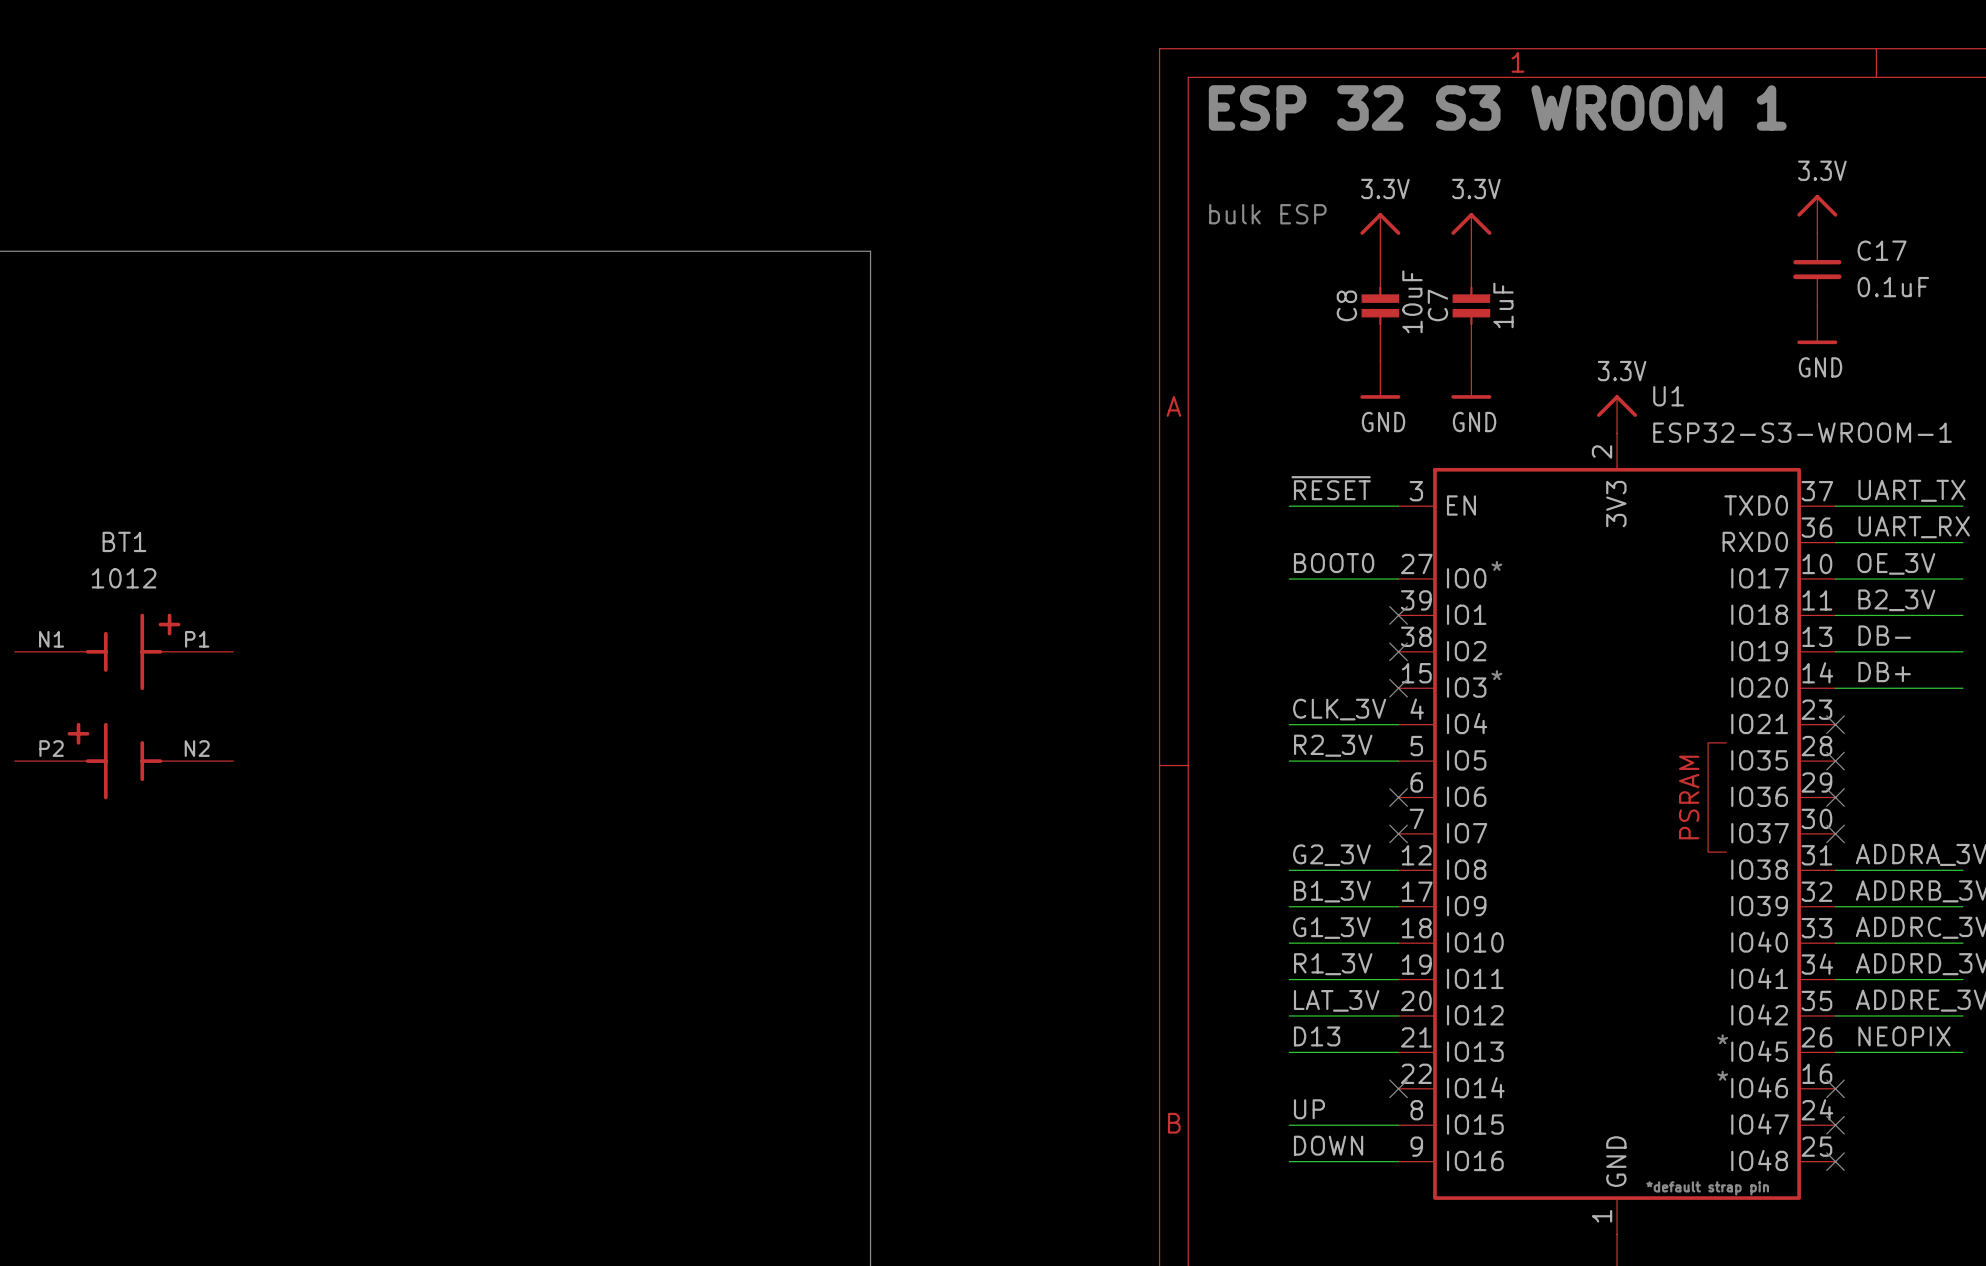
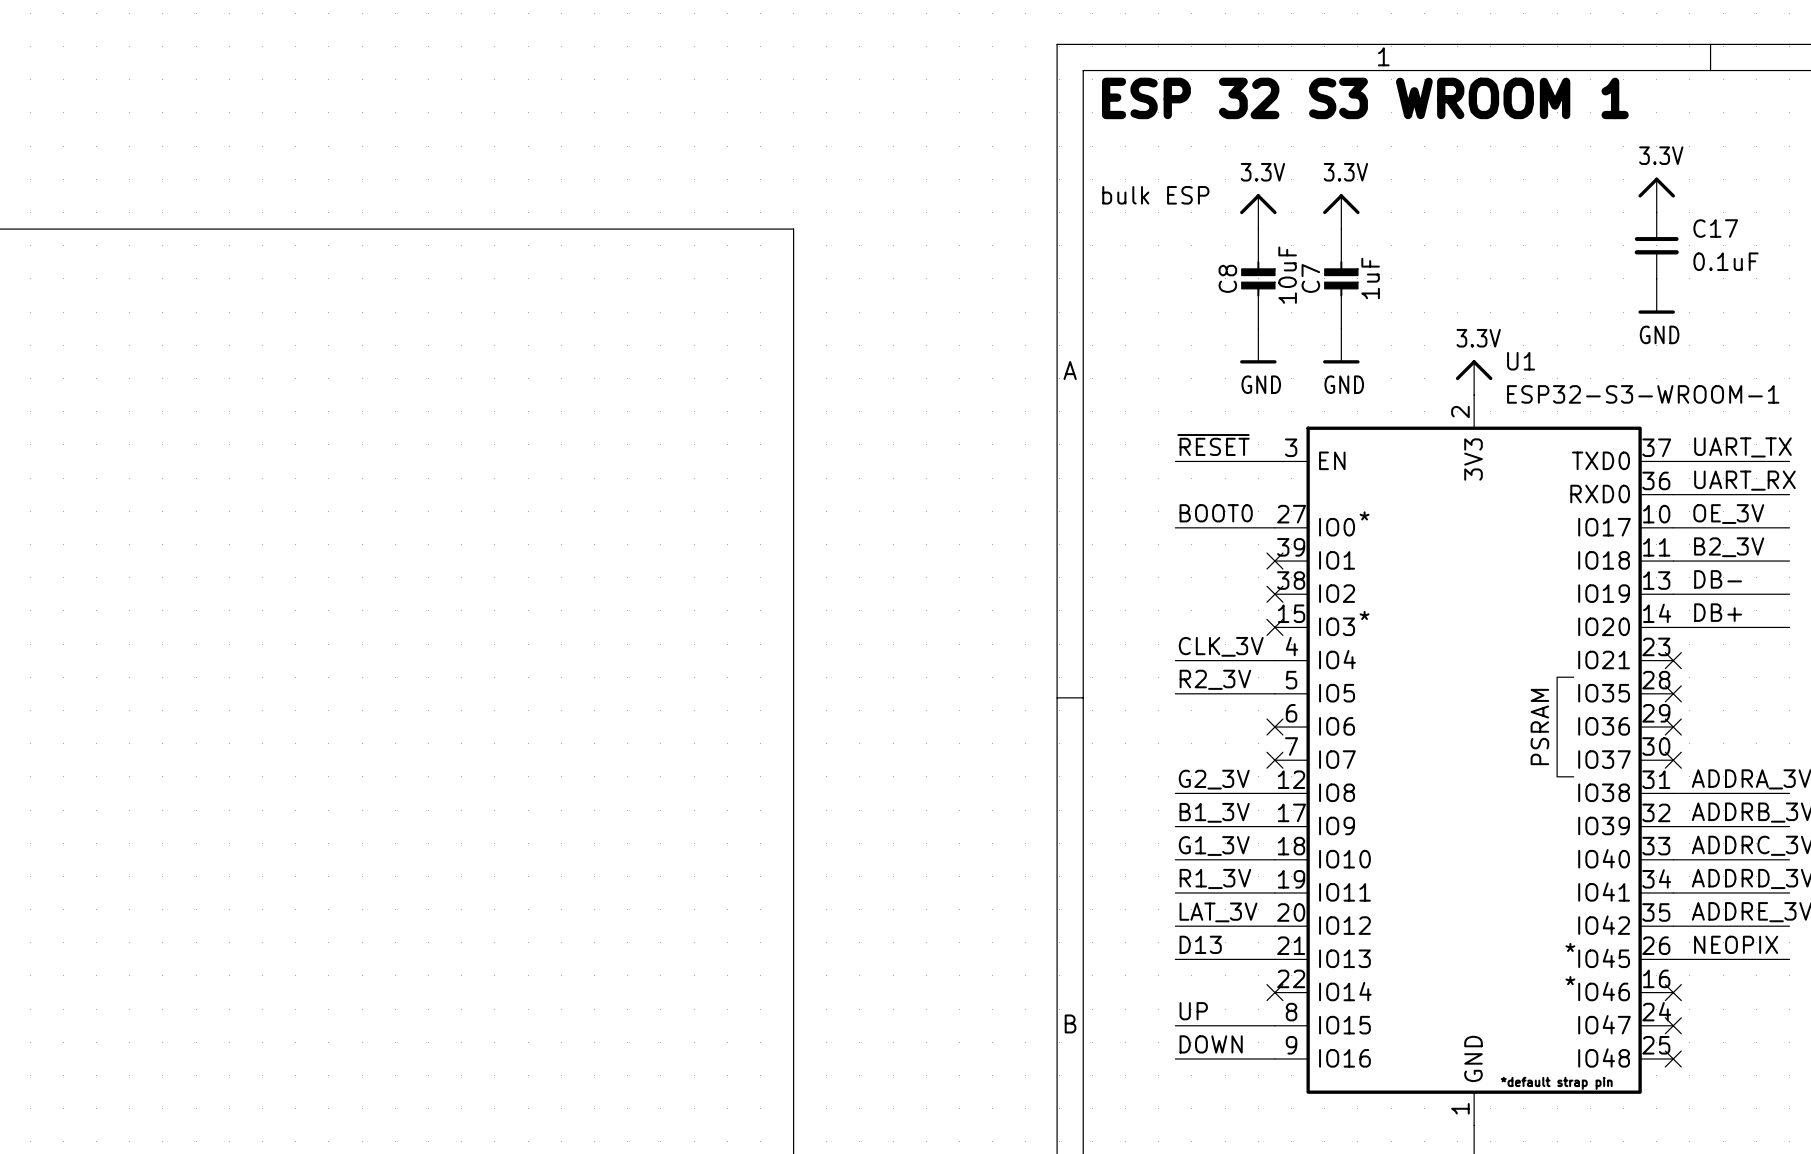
BT1: 1012 (124, 706) -> none

